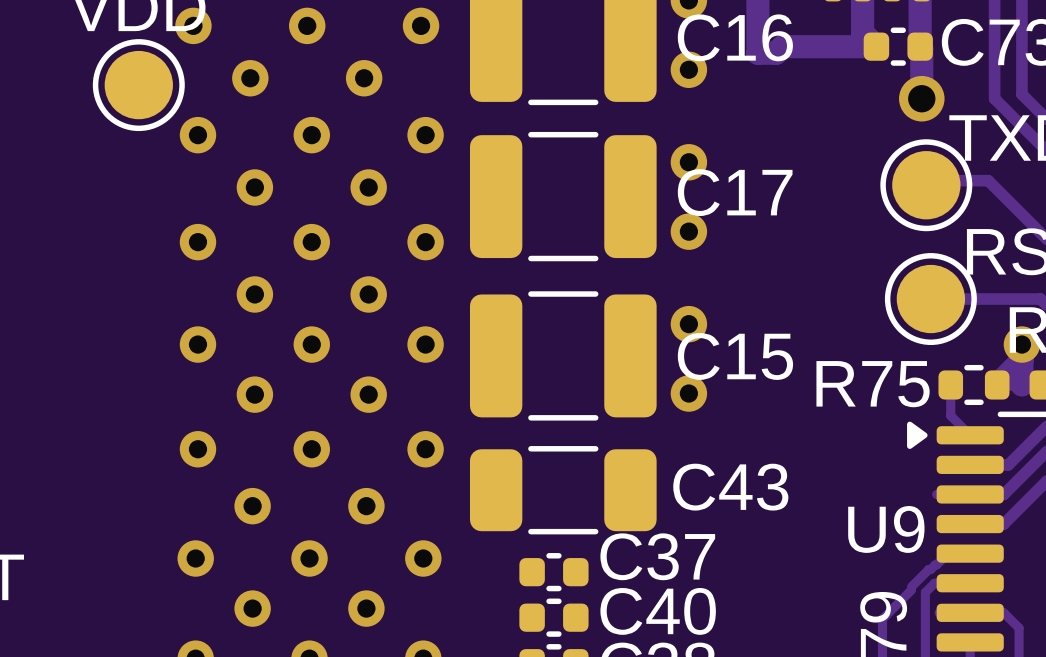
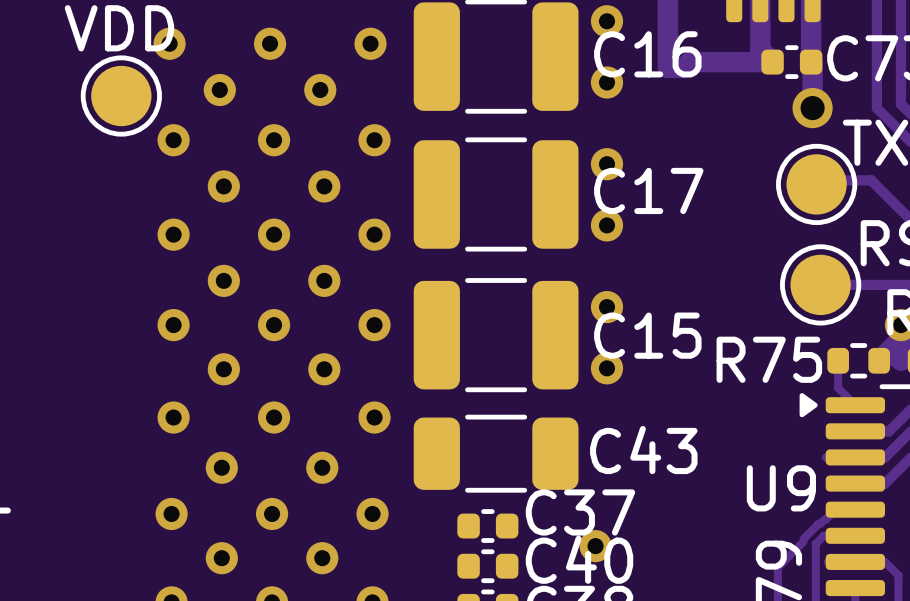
via: none -> (595, 546)

